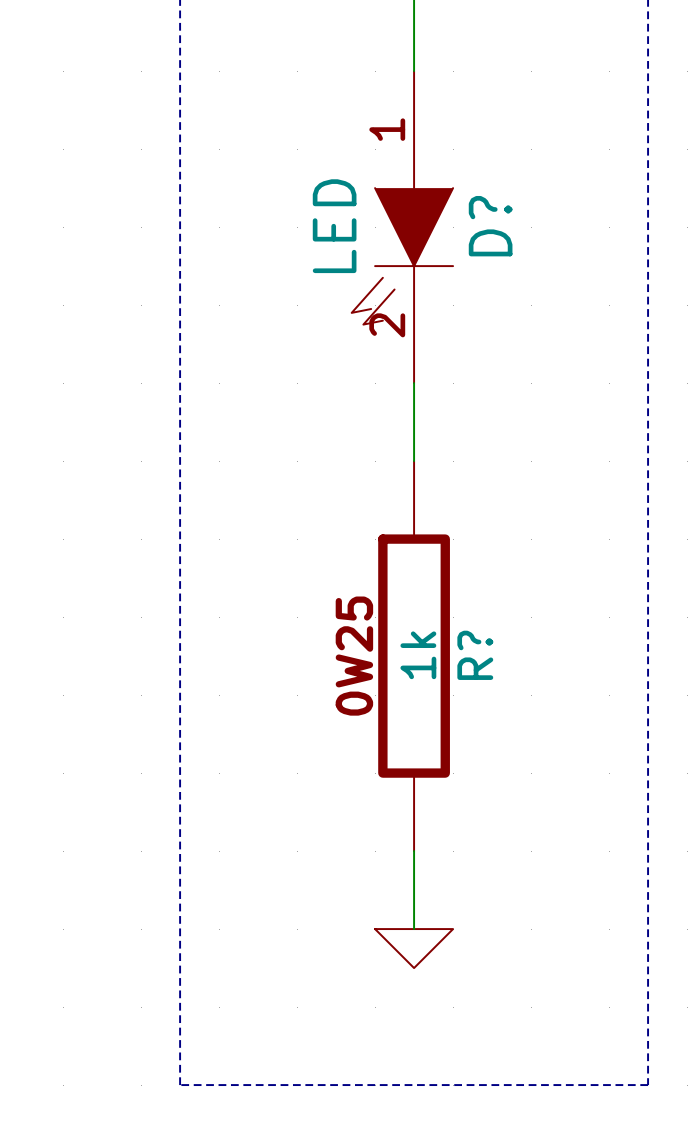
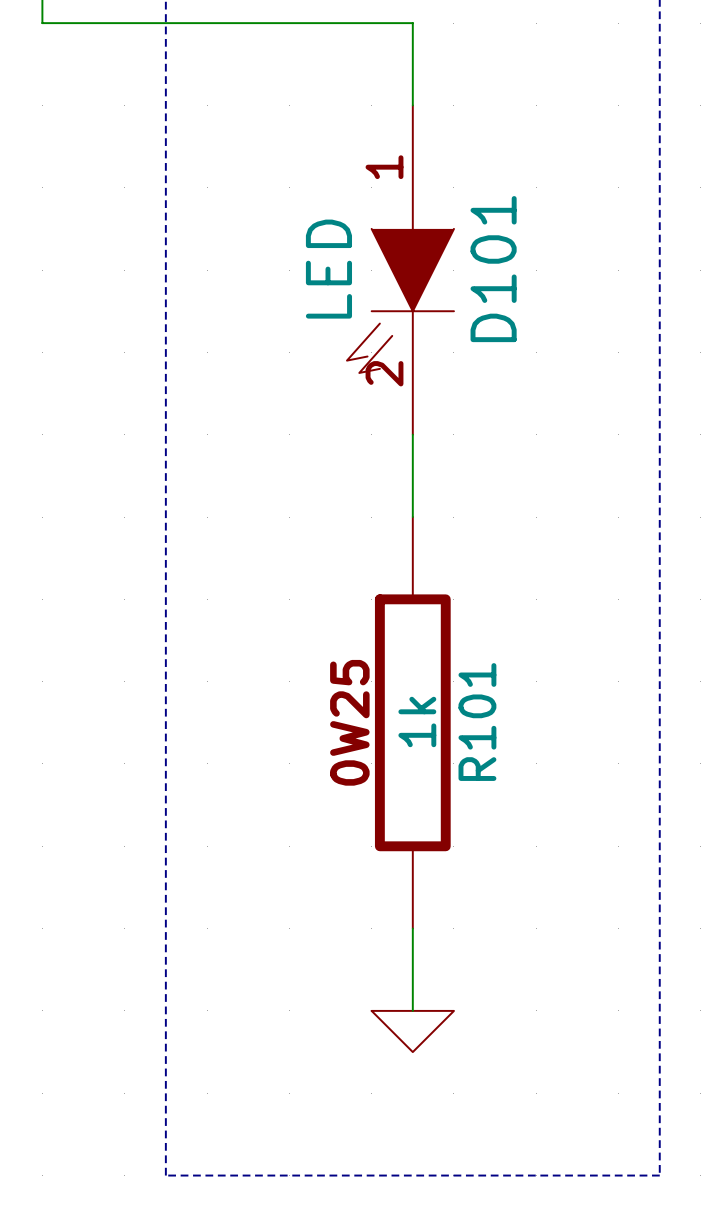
D? name: D? (490, 226) -> D101 (493, 269)
R? name: R? (475, 655) -> R101 (477, 722)

